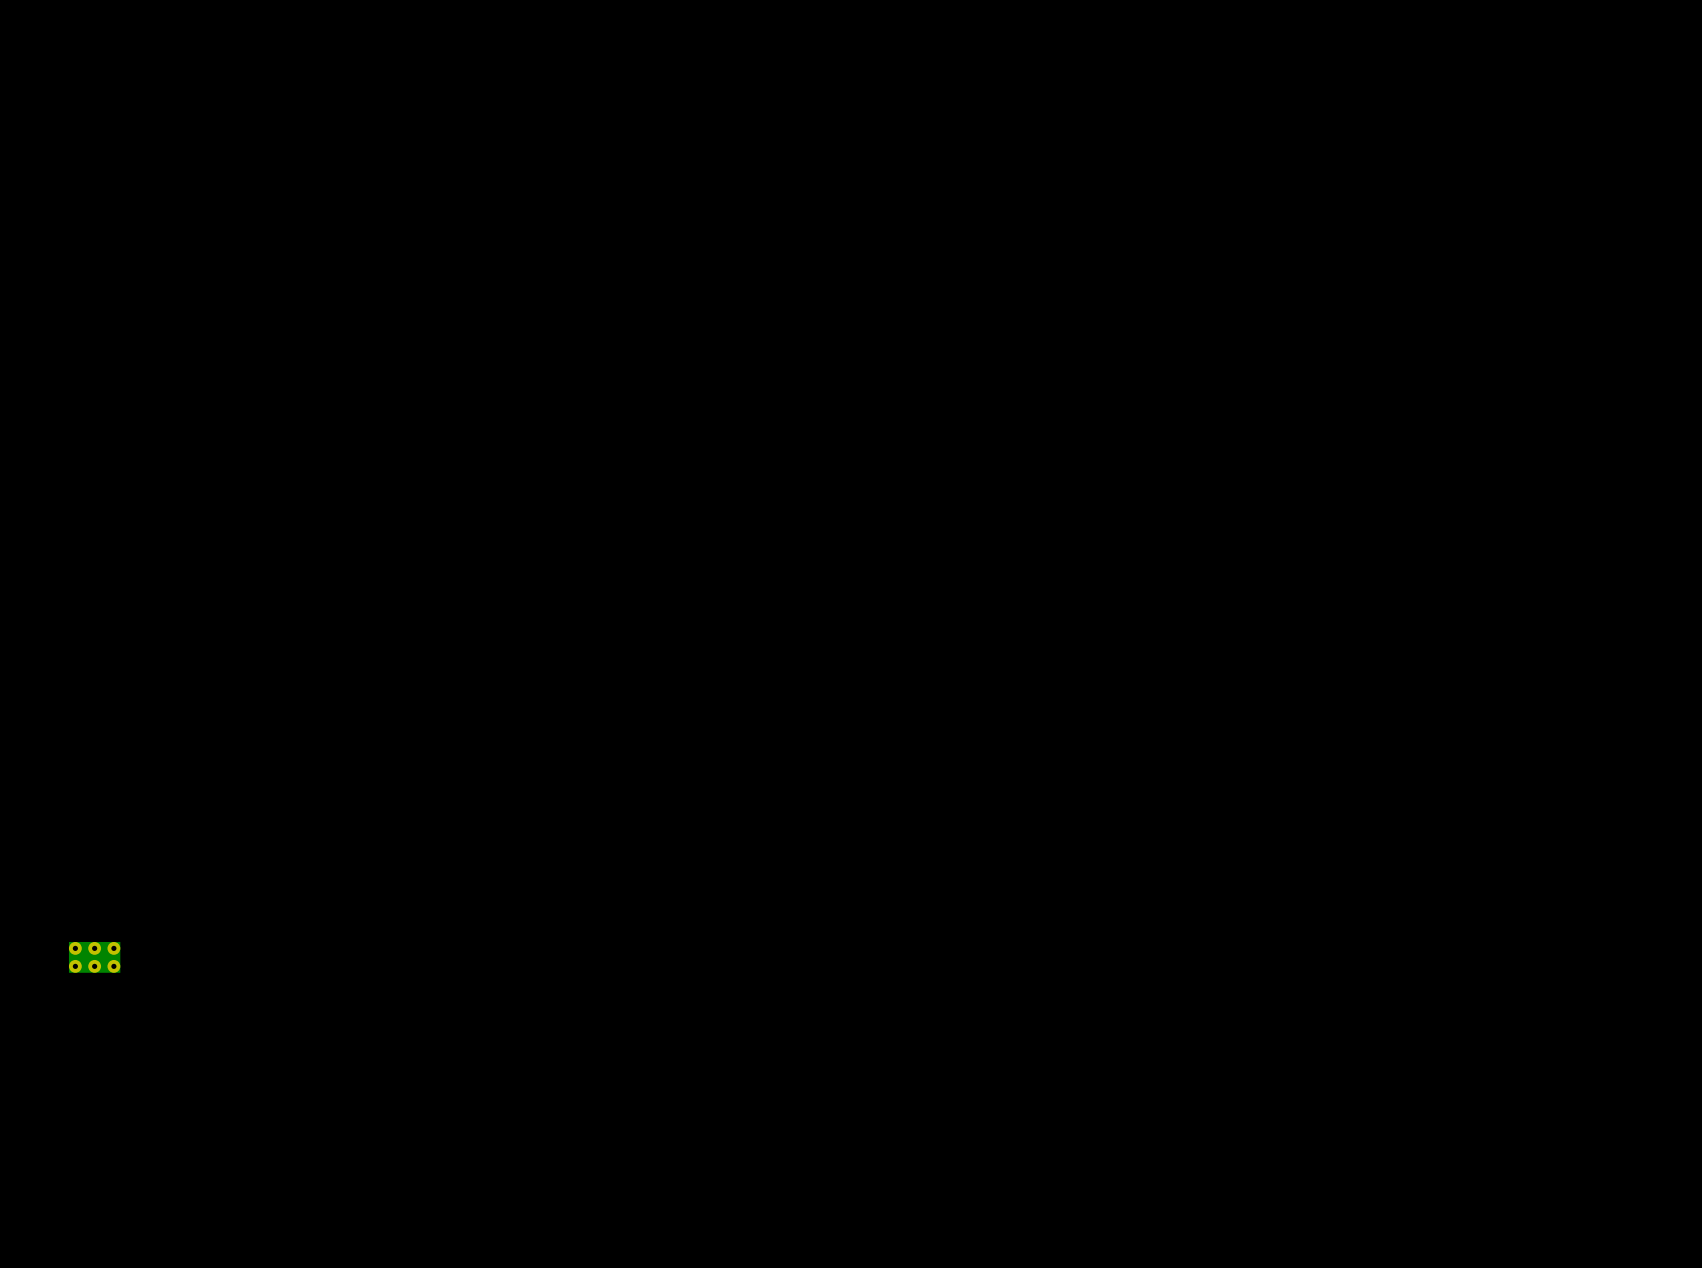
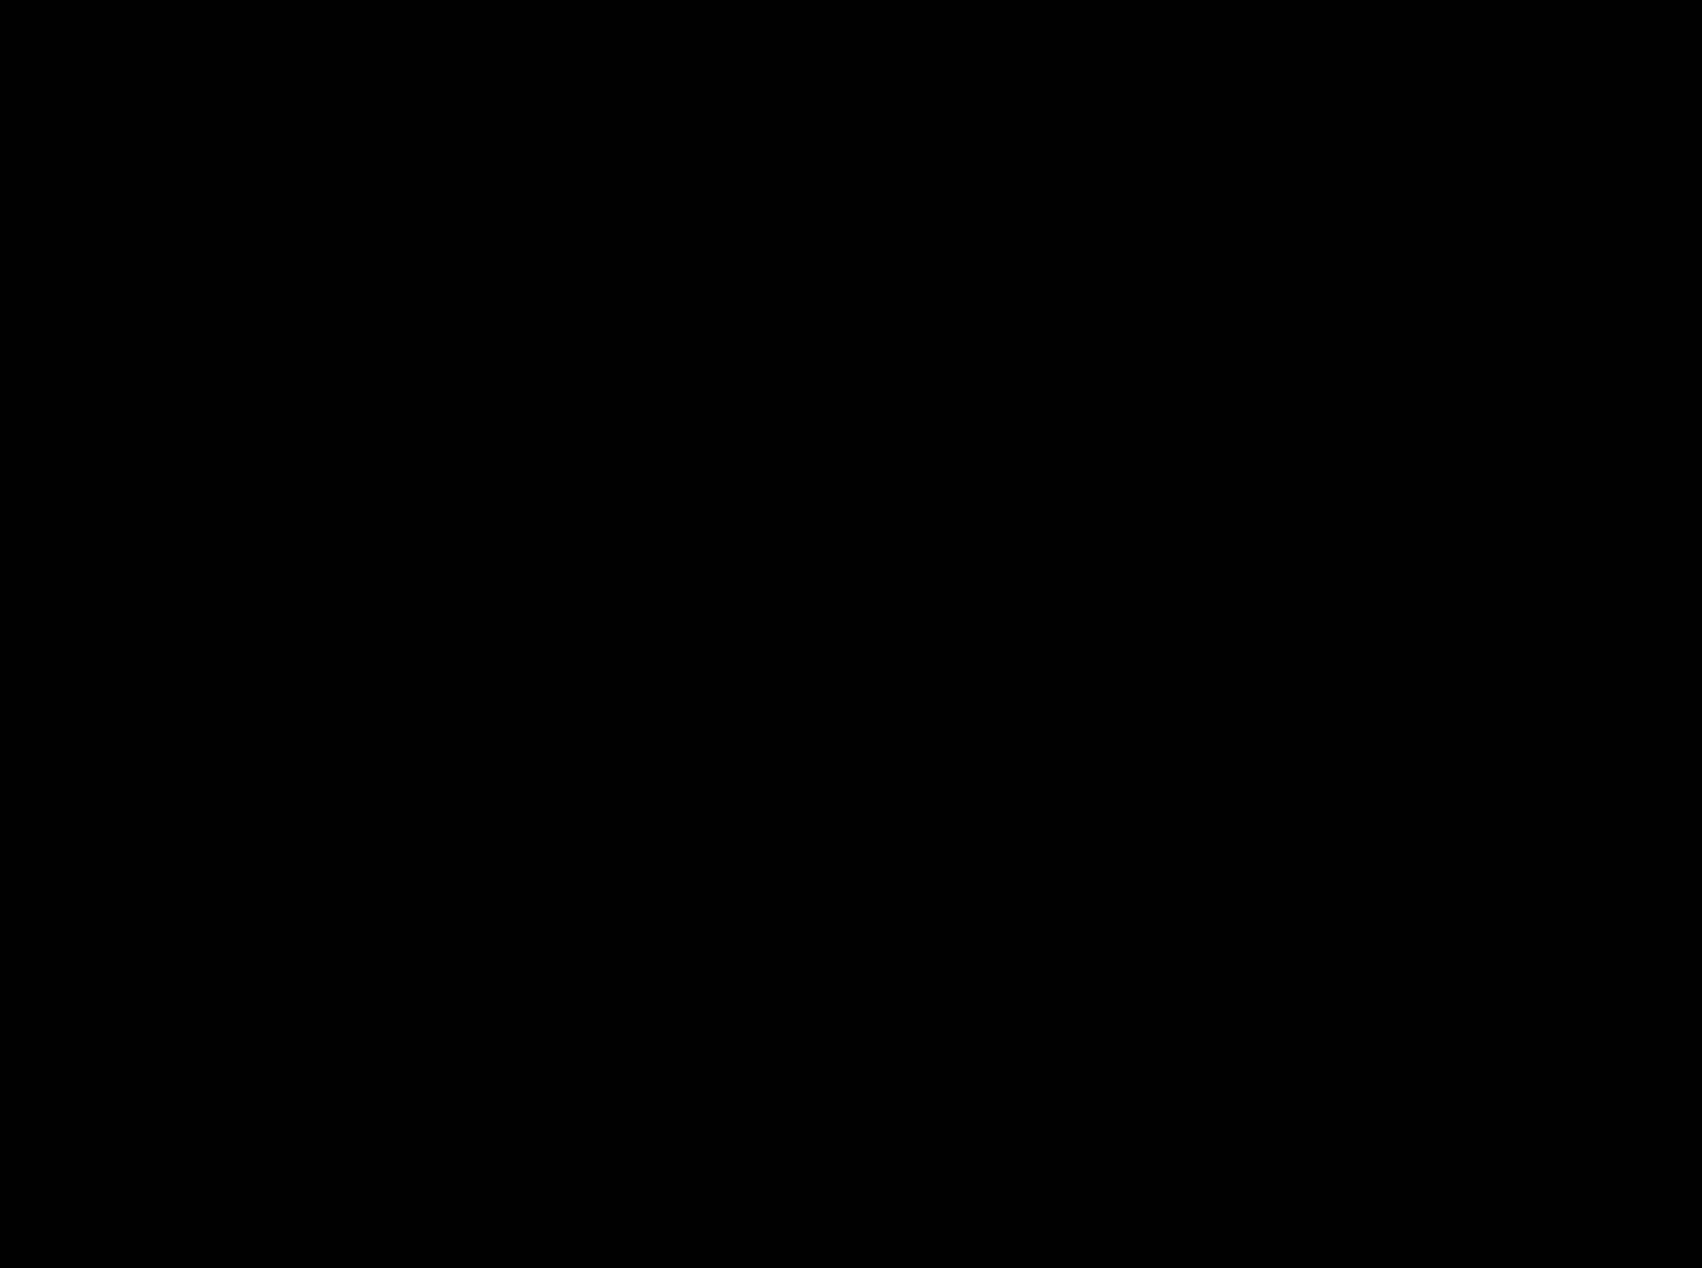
part: (94, 957) -> none

